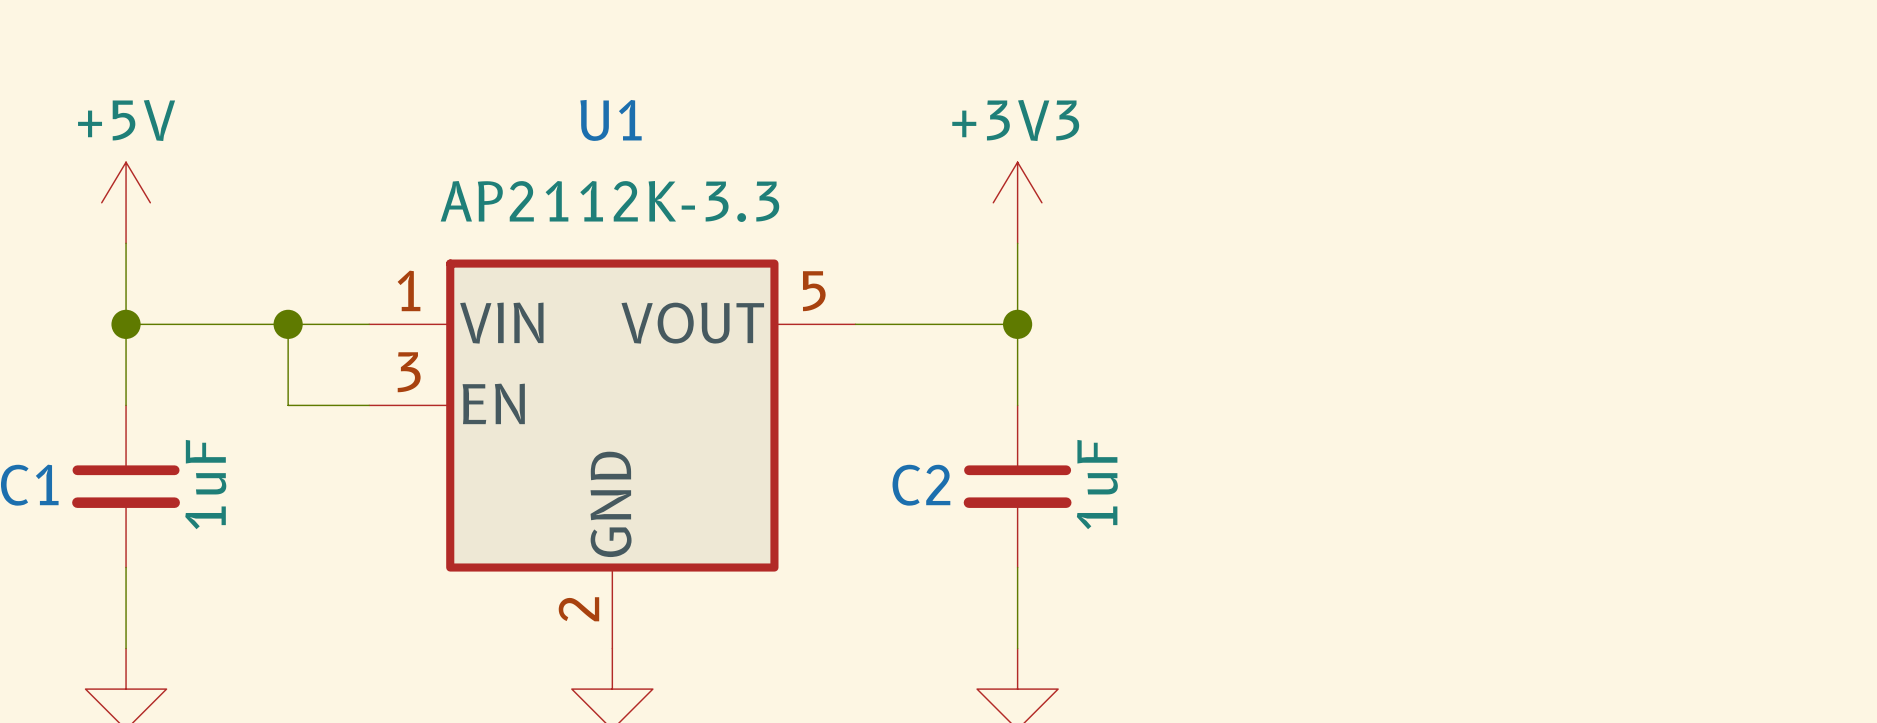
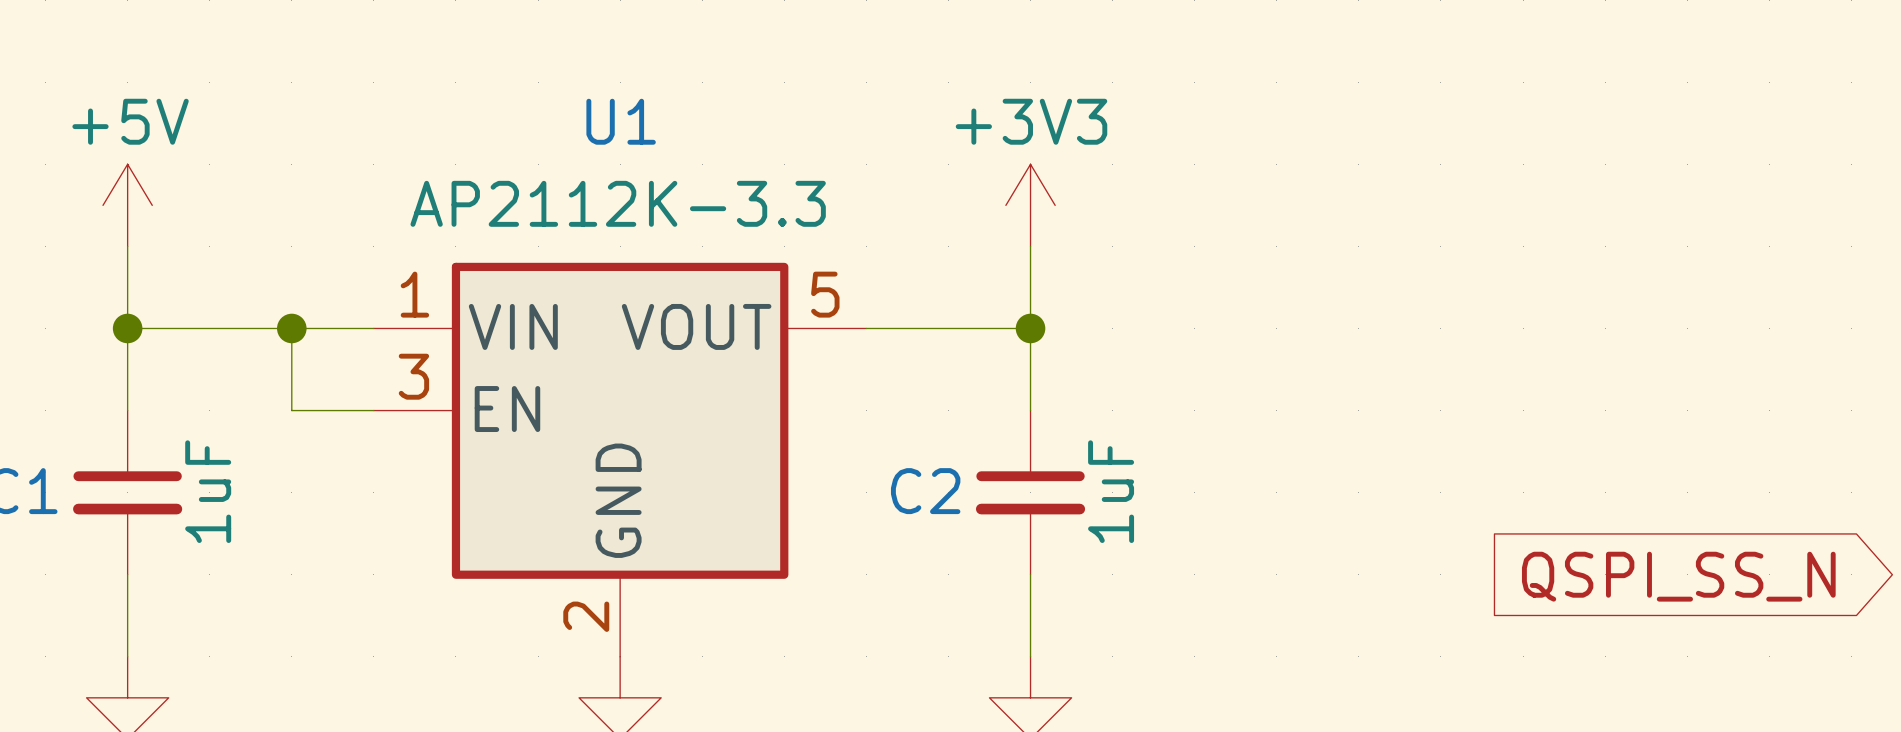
global label: none -> QSPI_SS_N (1678, 576)

